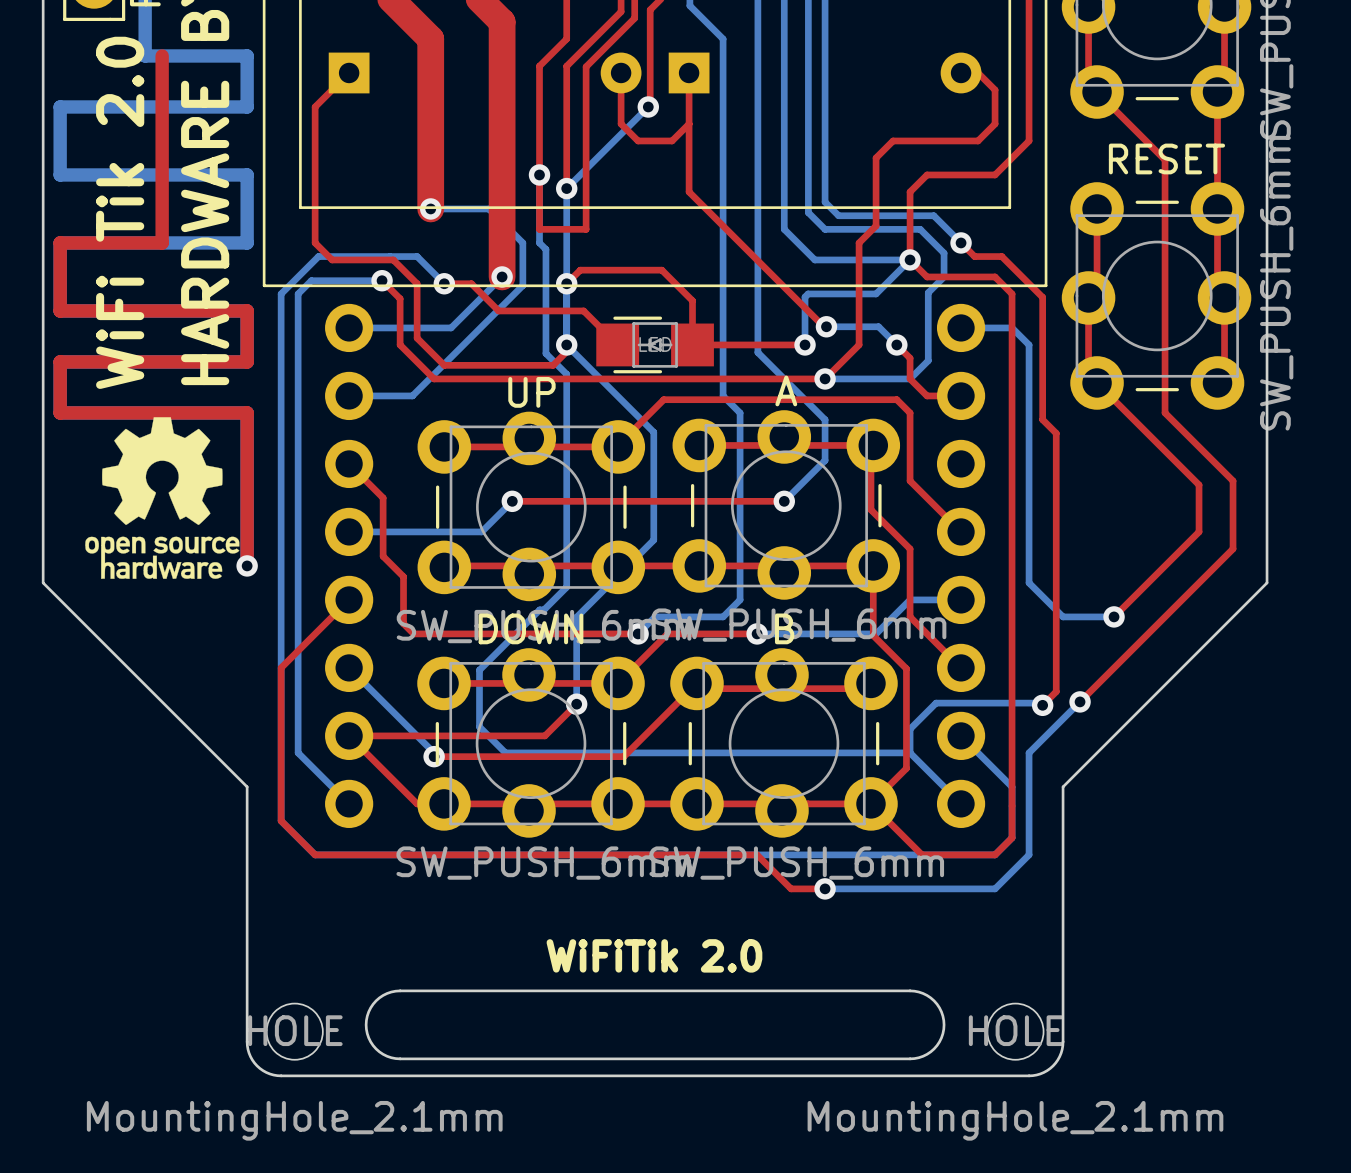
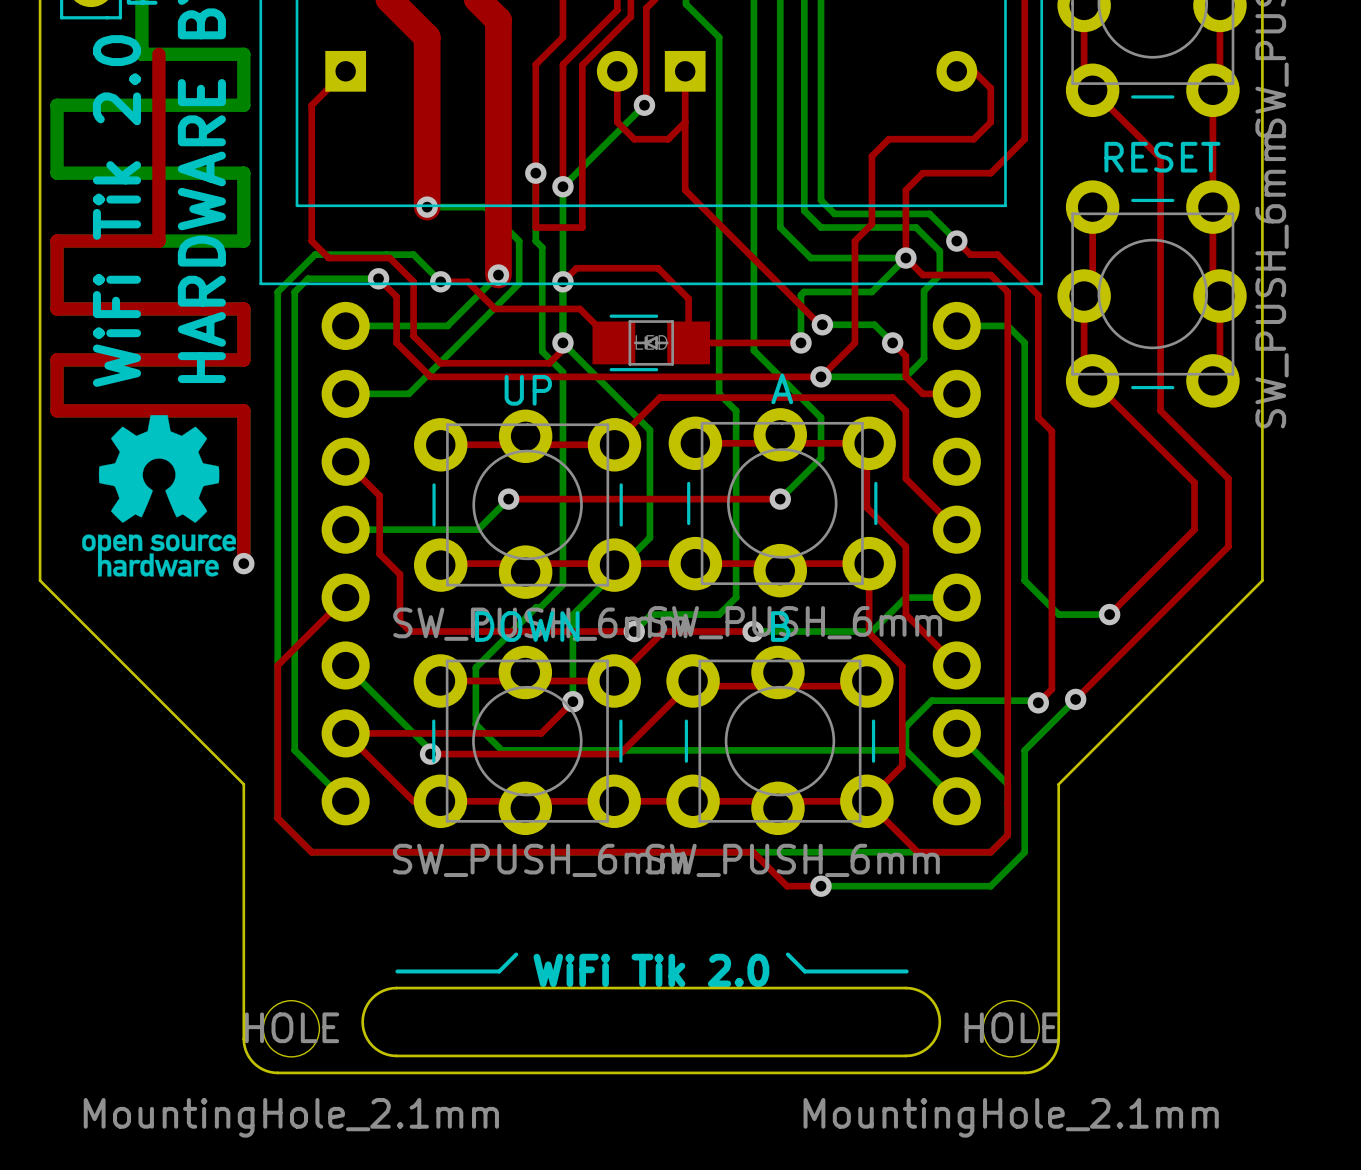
text: WiFiTik 2.0 (654, 955) -> WiFi Tik 2.0 (651, 970)
line: none -> (516, 954) (499, 971) (397, 971)
line: none -> (787, 954) (804, 971) (906, 971)

